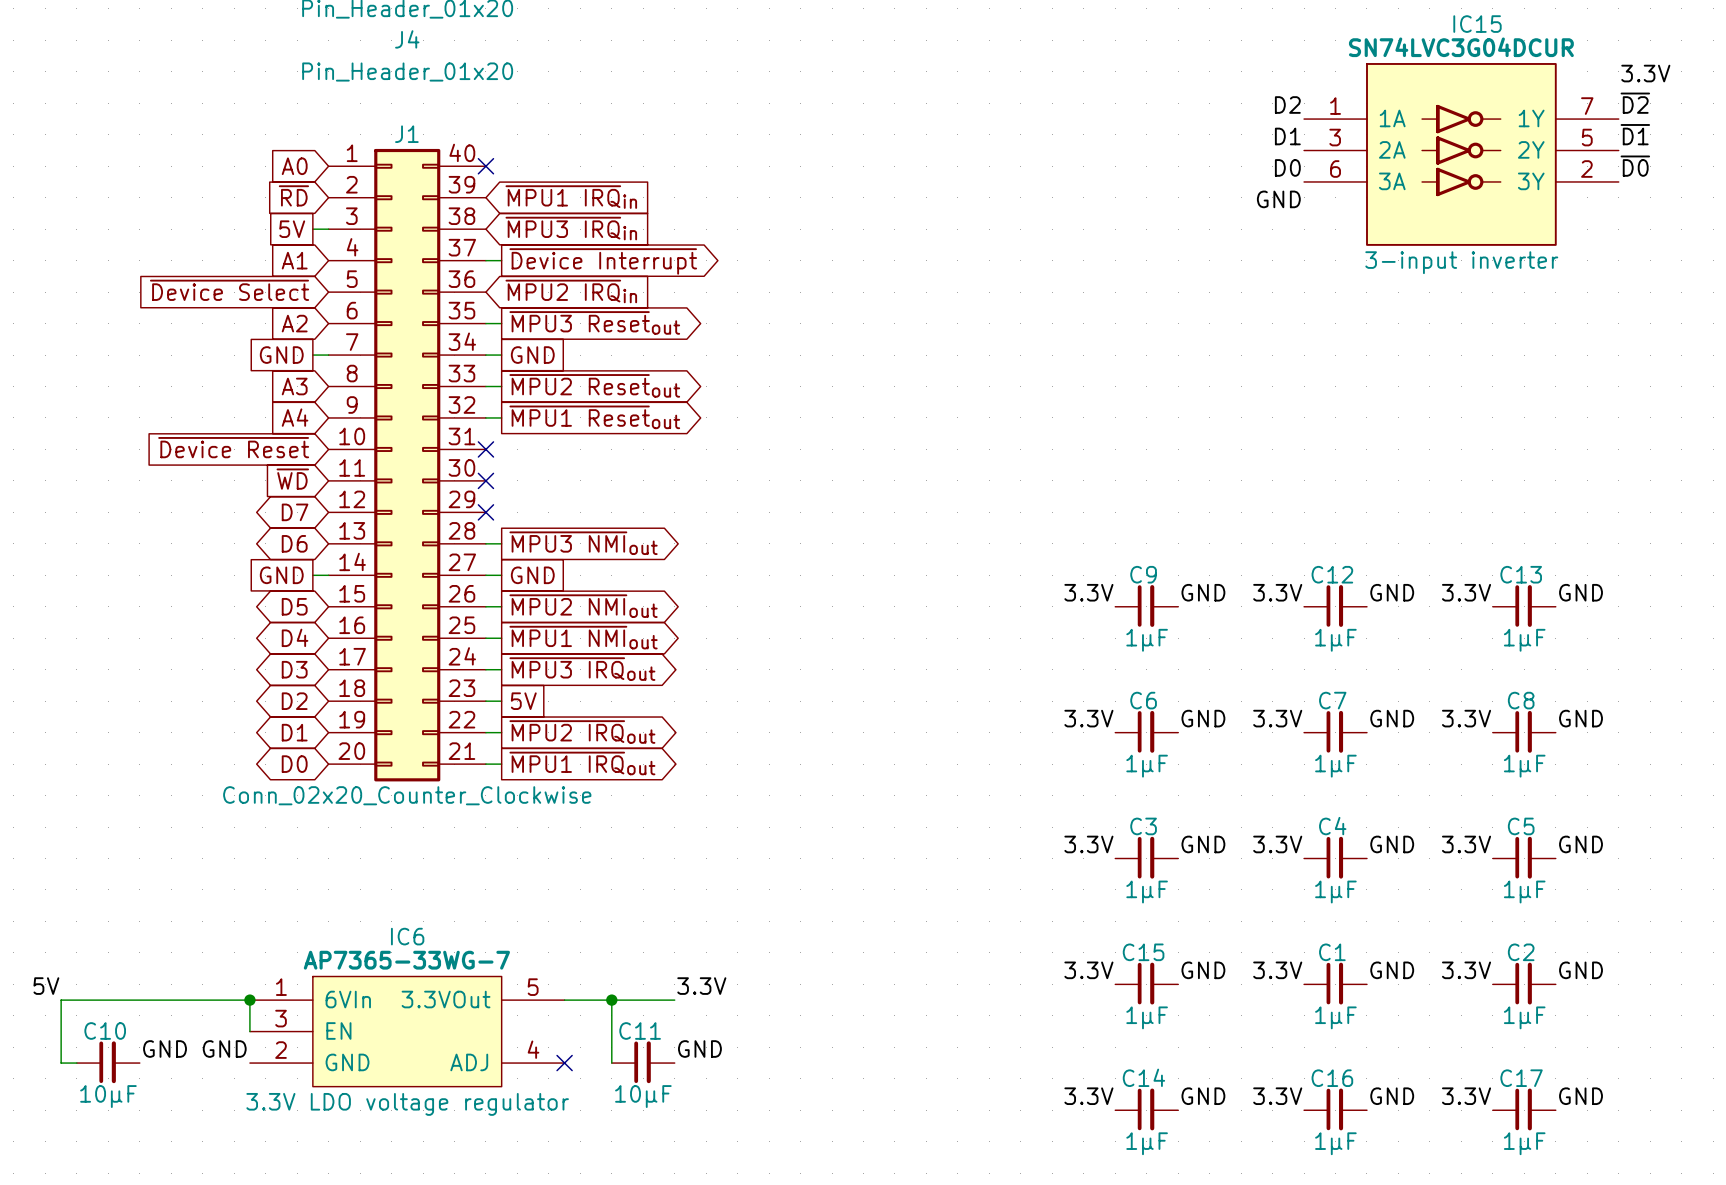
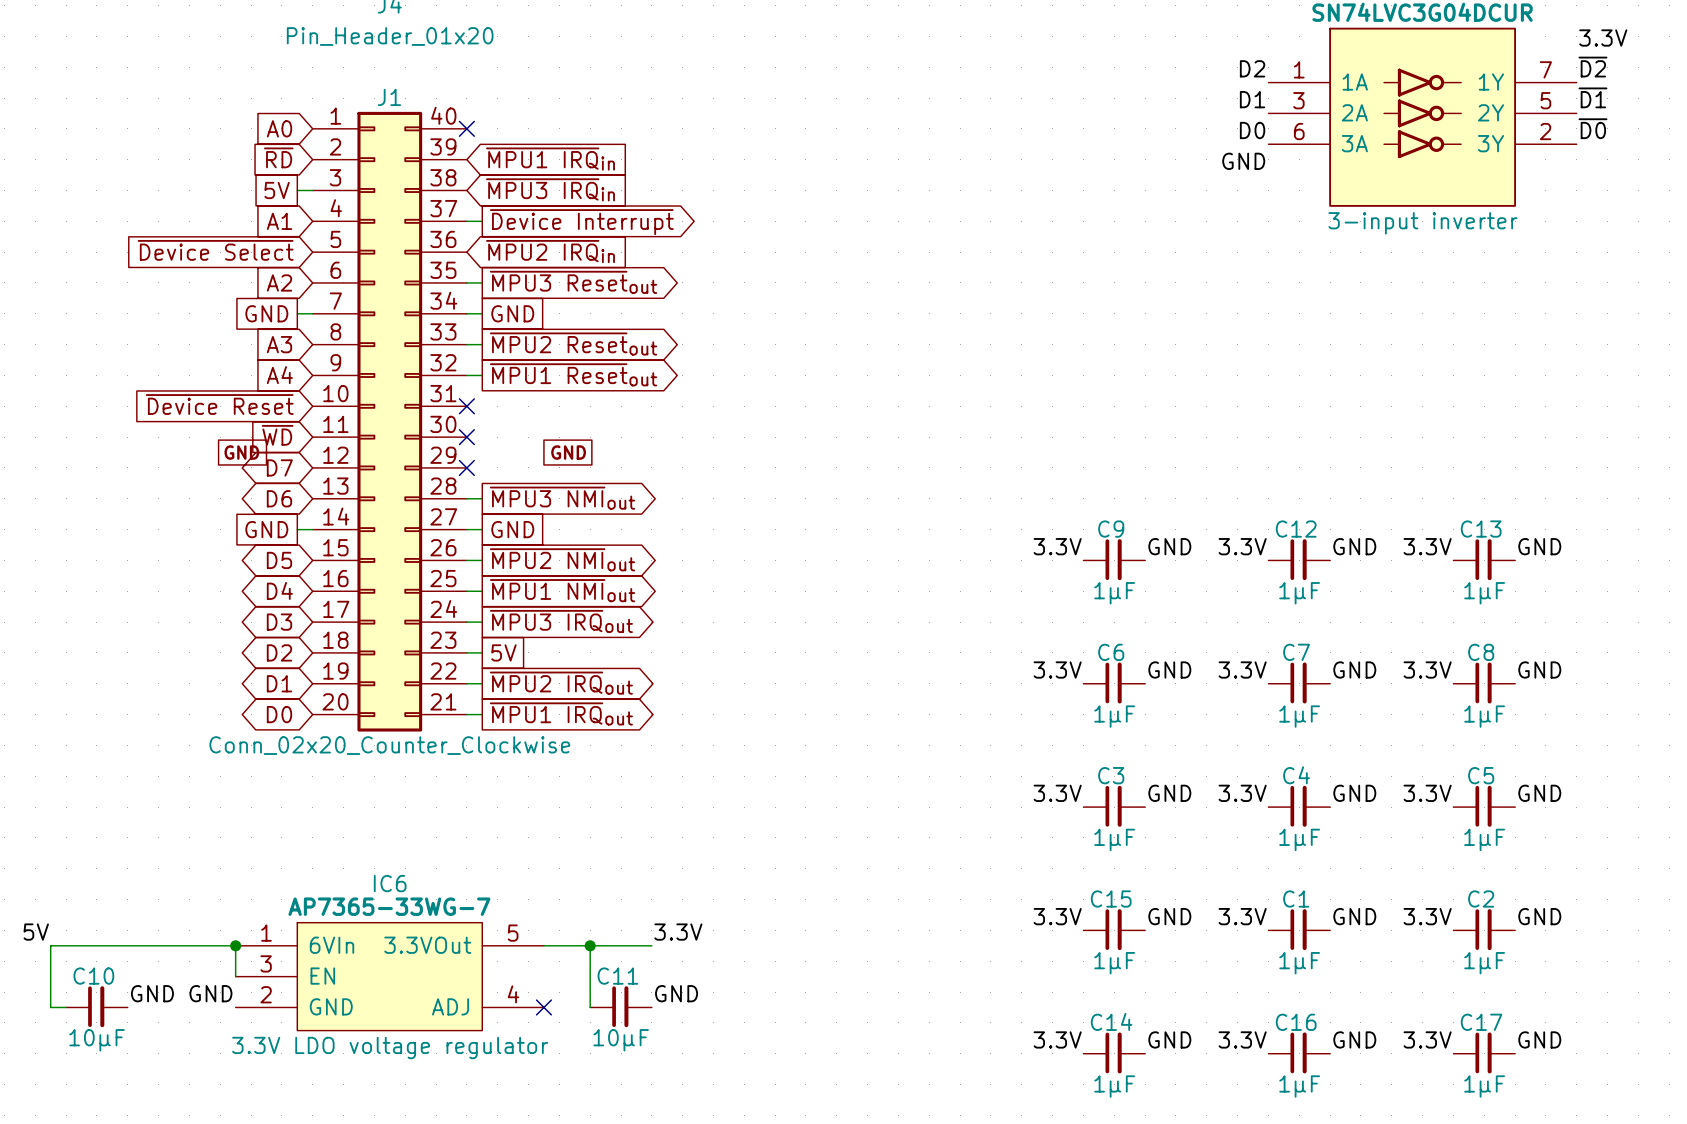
global label: none -> GND (241, 452)
global label: none -> GND (568, 452)

